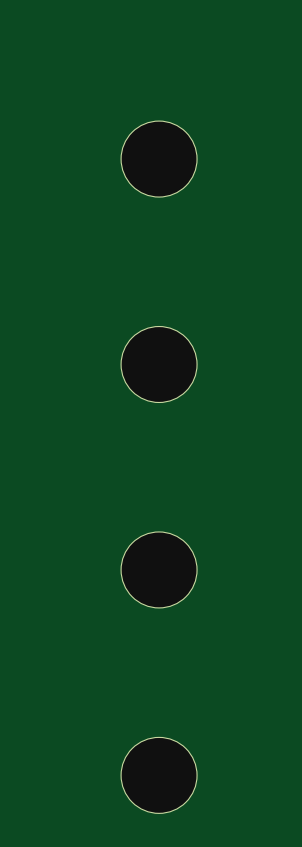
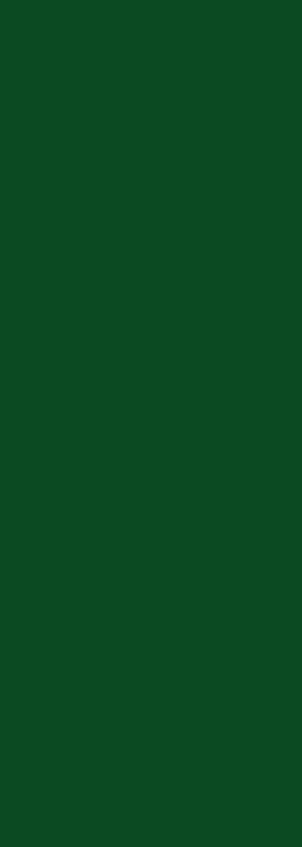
part: (159, 159) -> none
part: (159, 364) -> none
part: (159, 569) -> none
part: (159, 775) -> none

